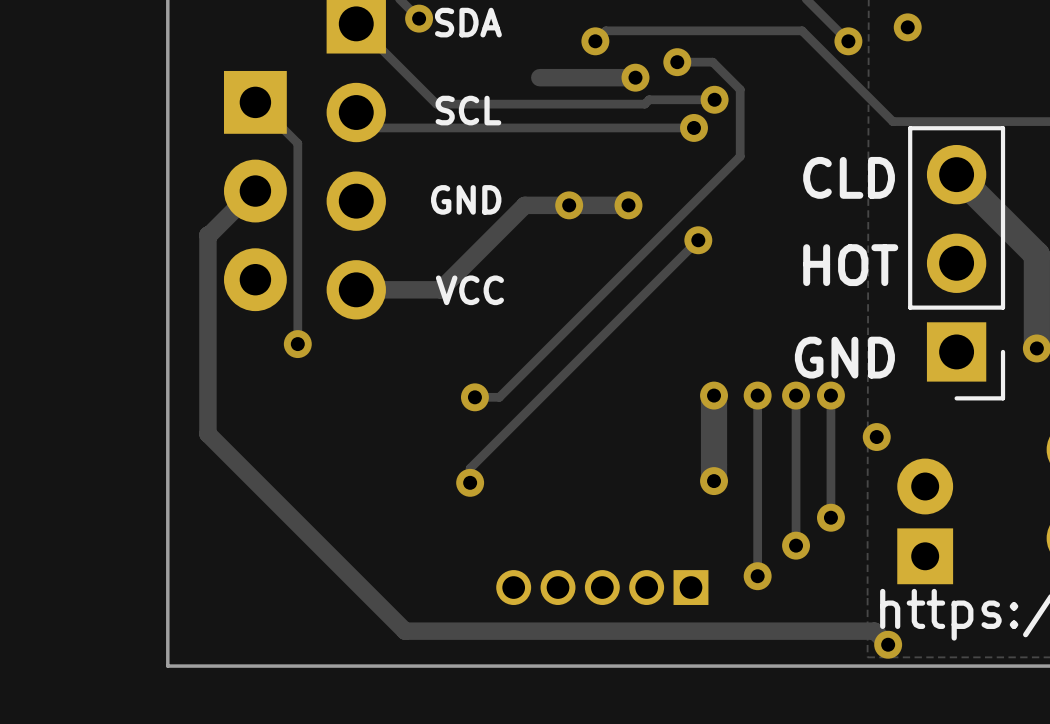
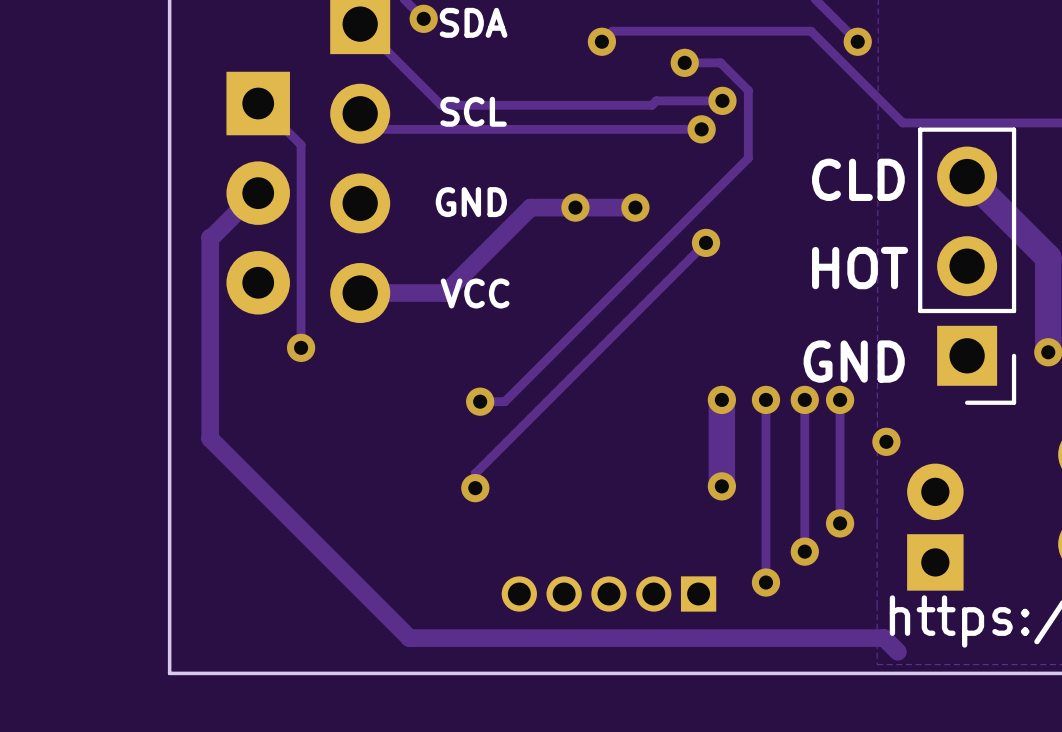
via: (907, 27) -> none
track: (635, 77) (539, 77) -> none
via: (635, 77) -> none
via: (888, 644) -> none

